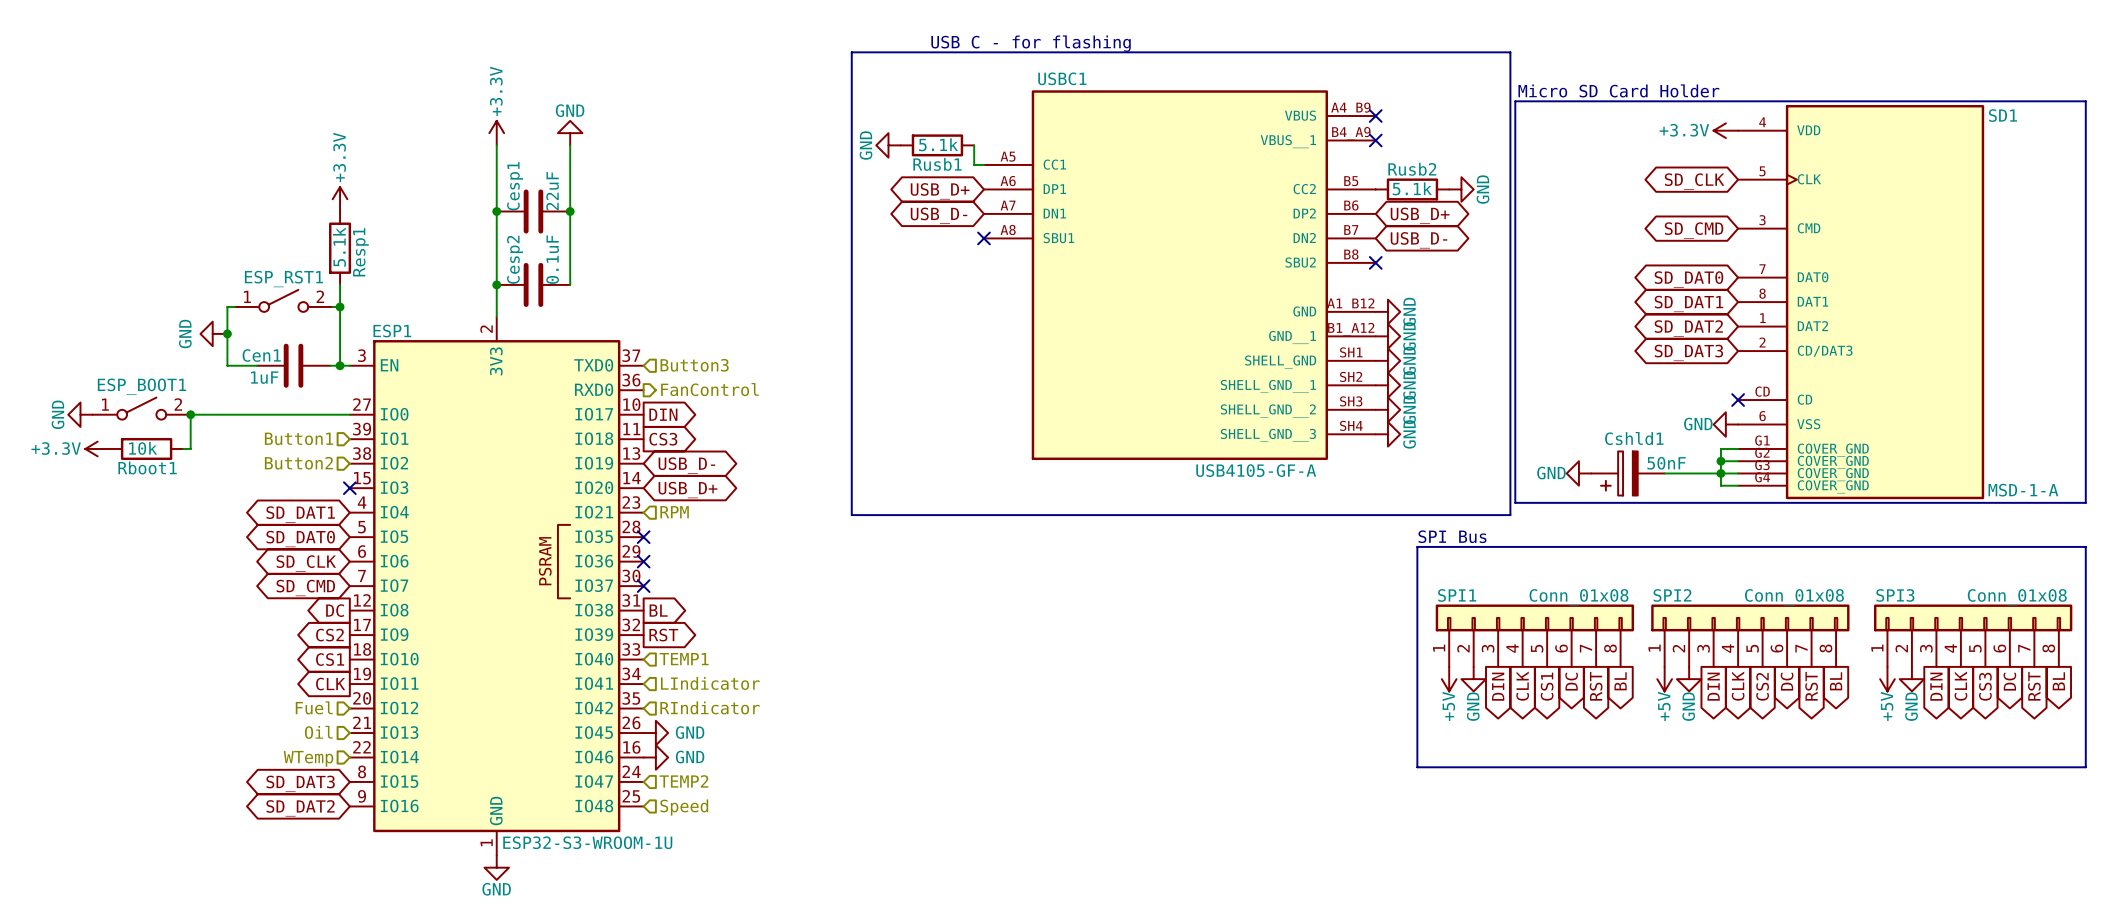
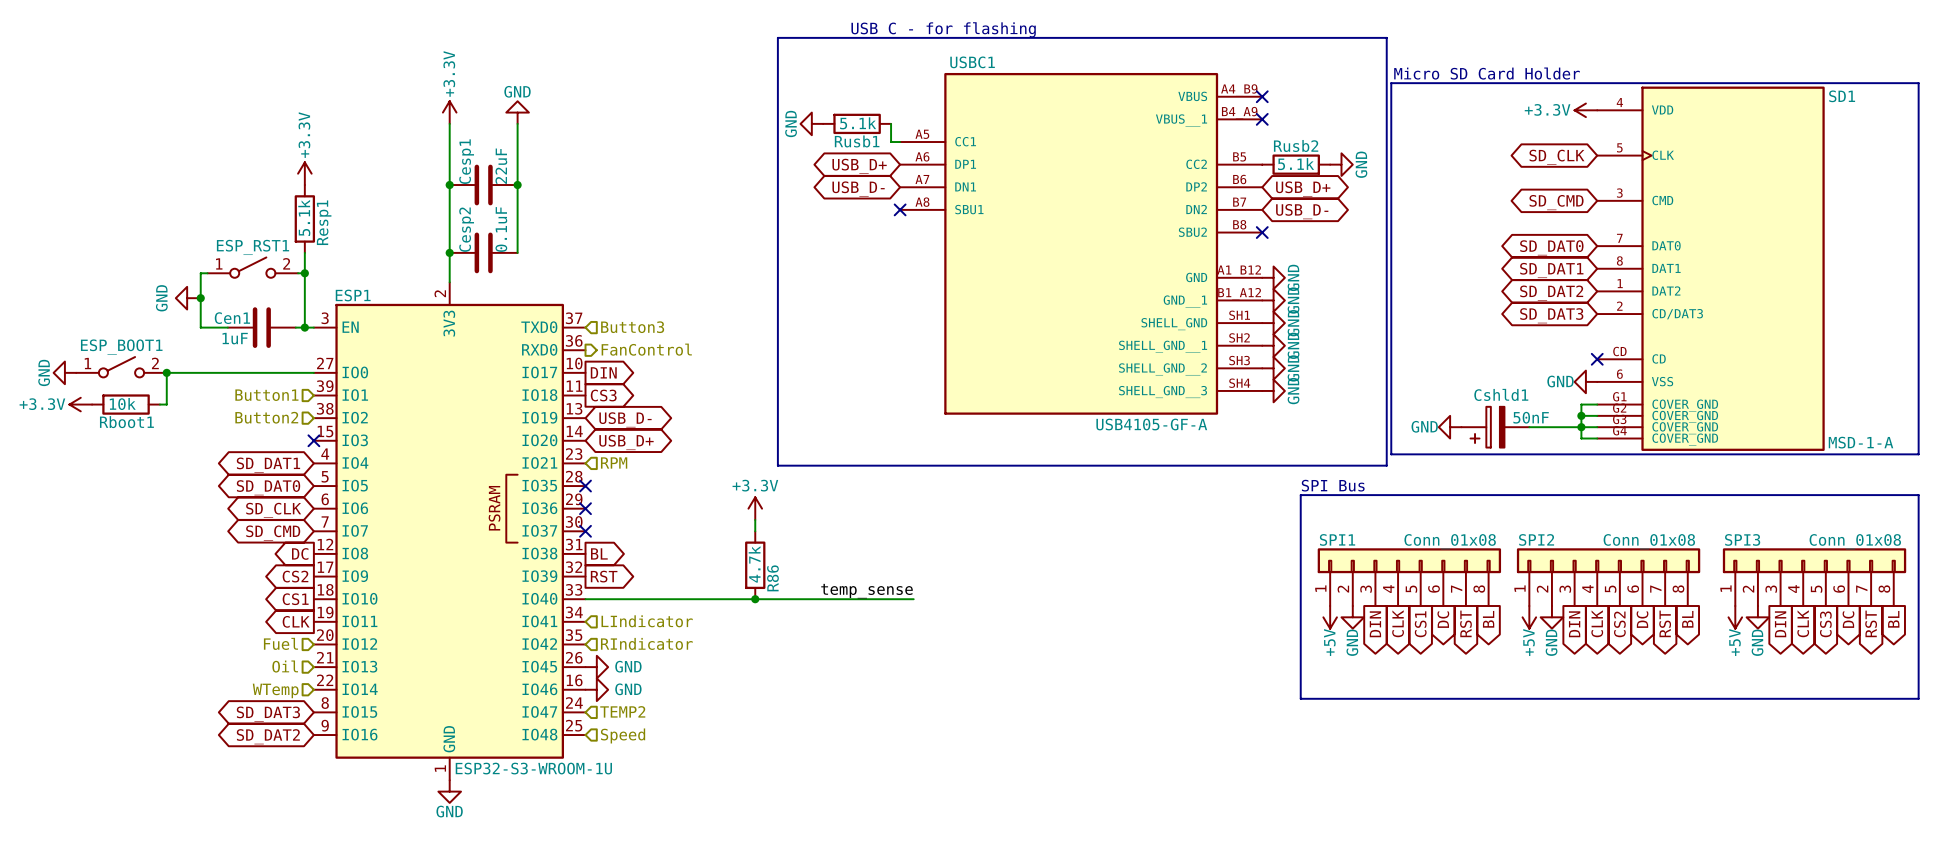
power symbol: none -> +3.3V (755, 508)
wire: none -> (755, 519) (755, 531)
R86: none -> 4.7k (755, 565)
label: none -> temp_sense (867, 591)
wire: none -> (585, 599) (913, 599)
hierarchical label: TEMP1 (684, 659) -> none
junction: none -> (755, 599)

